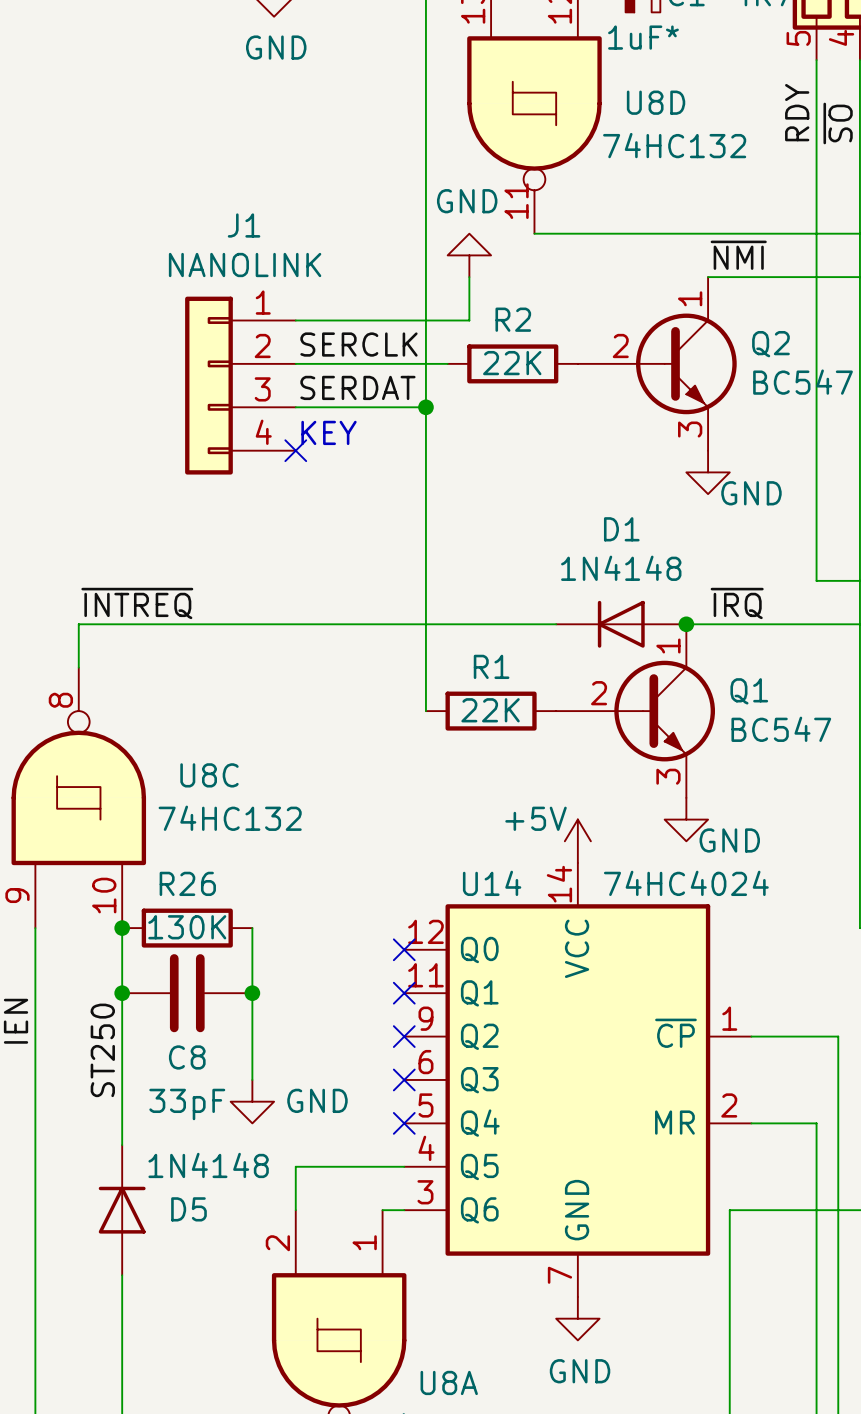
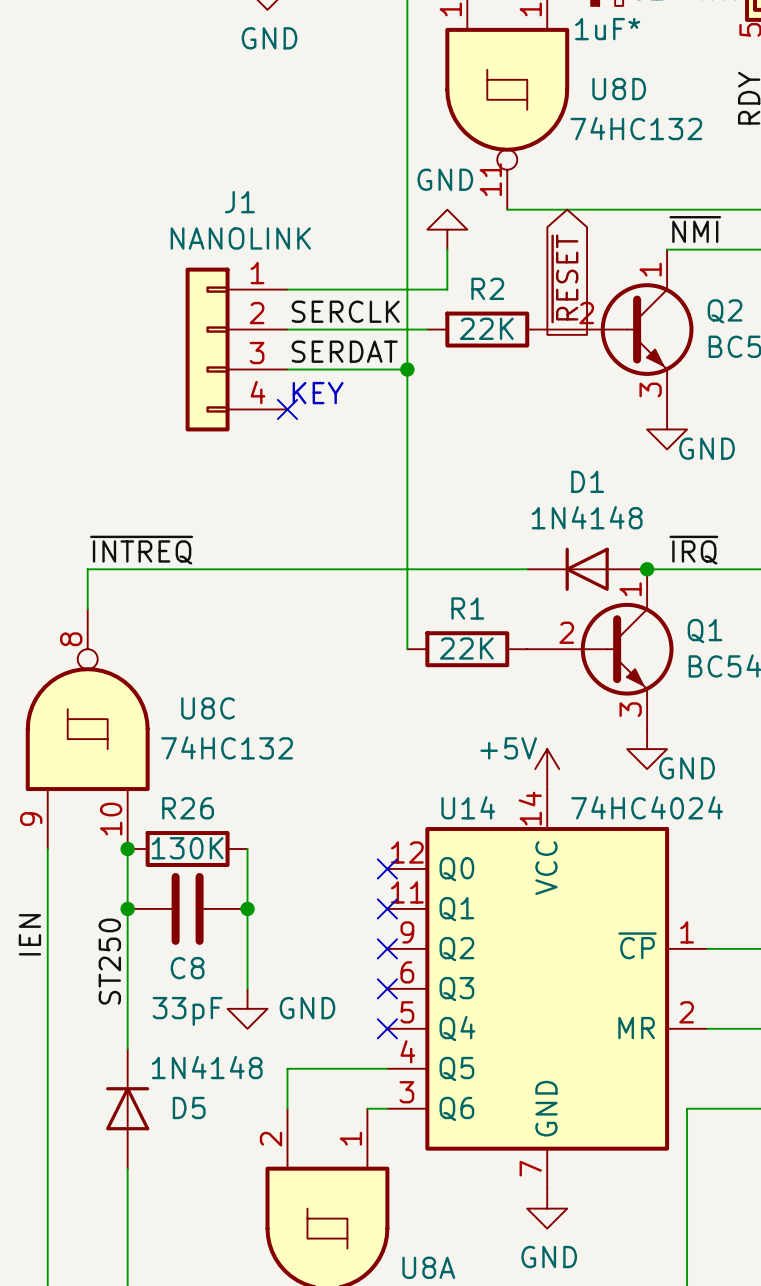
global label: none -> ~{RESET} (564, 278)

